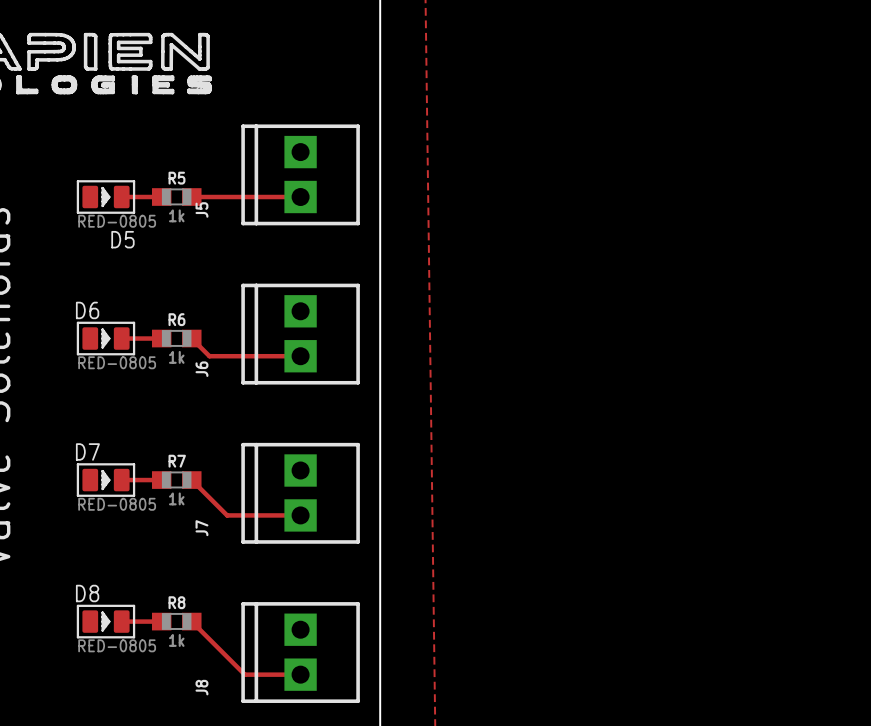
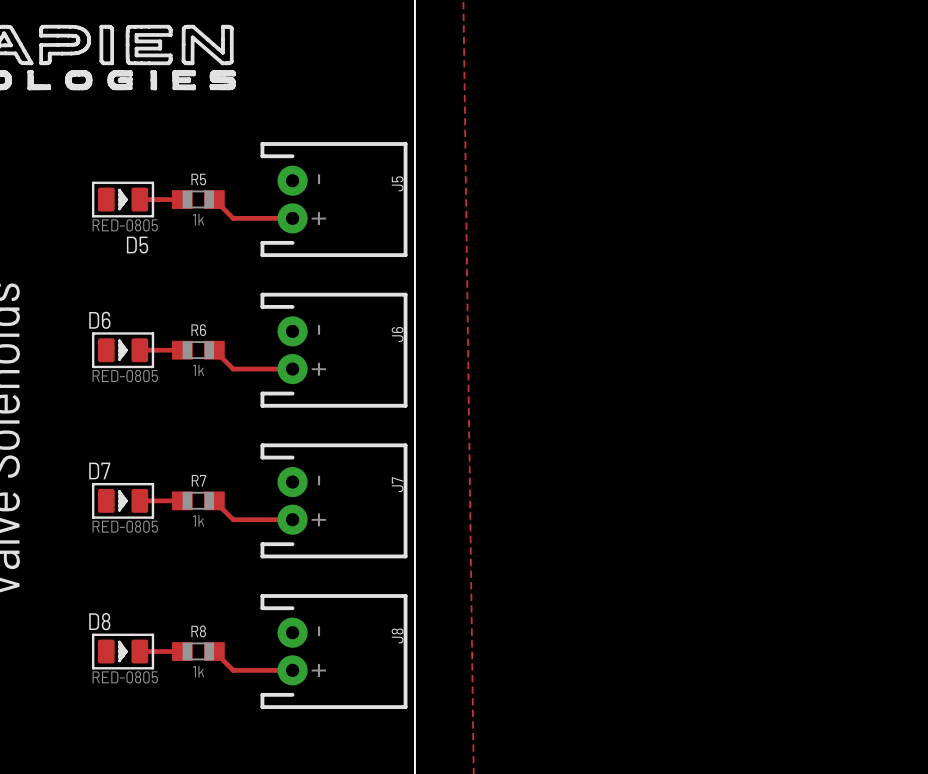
J5 footprint: [241, 124, 360, 226] -> [260, 142, 408, 258]
track: (191, 197) (300, 197) -> (214, 199) (233, 218) (292, 218)
J5 name position: J5 (201, 209) -> J5 (397, 183)
J6 footprint: [241, 283, 360, 385] -> [260, 292, 408, 408]
track: (265, 356) (300, 356) -> none
J6 name position: J6 (201, 369) -> J6 (397, 334)
J7 footprint: [241, 442, 360, 544] -> [260, 443, 408, 559]
track: (209, 497) (227, 515) (300, 515) -> (233, 519) (292, 519)
J7 name position: J7 (201, 528) -> J7 (397, 484)
J8 footprint: [241, 602, 360, 703] -> [260, 594, 408, 710]
track: (209, 639) (244, 674) (300, 674) -> (233, 670) (292, 670)
J8 name position: J8 (201, 687) -> J8 (397, 635)

